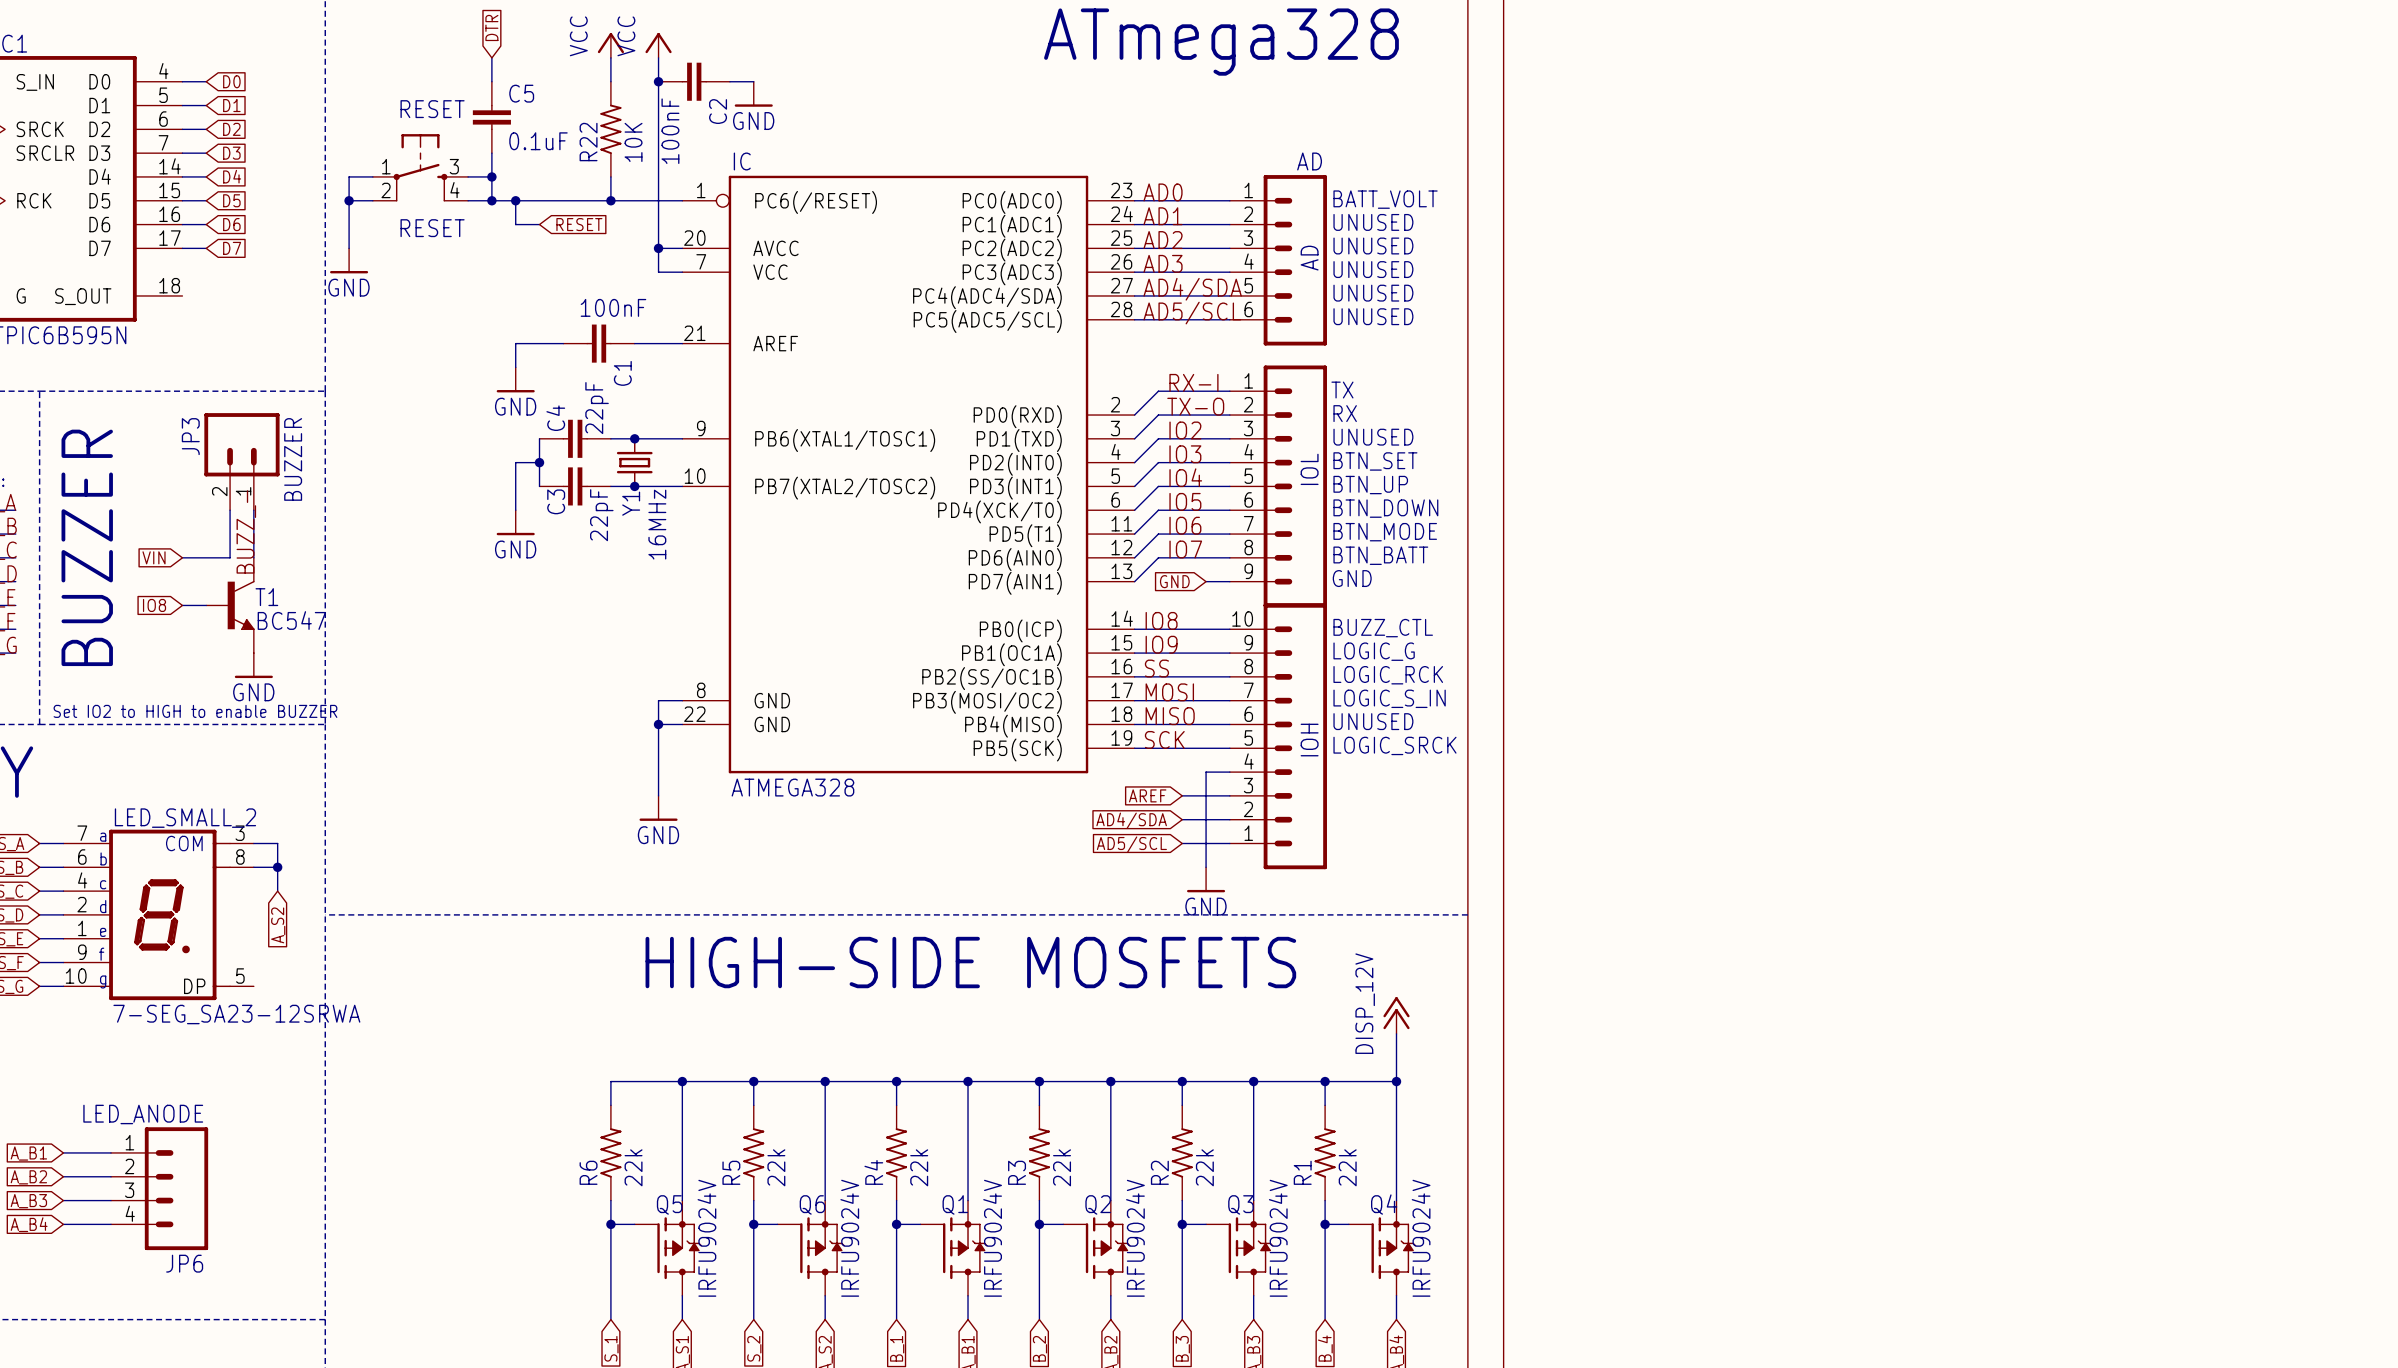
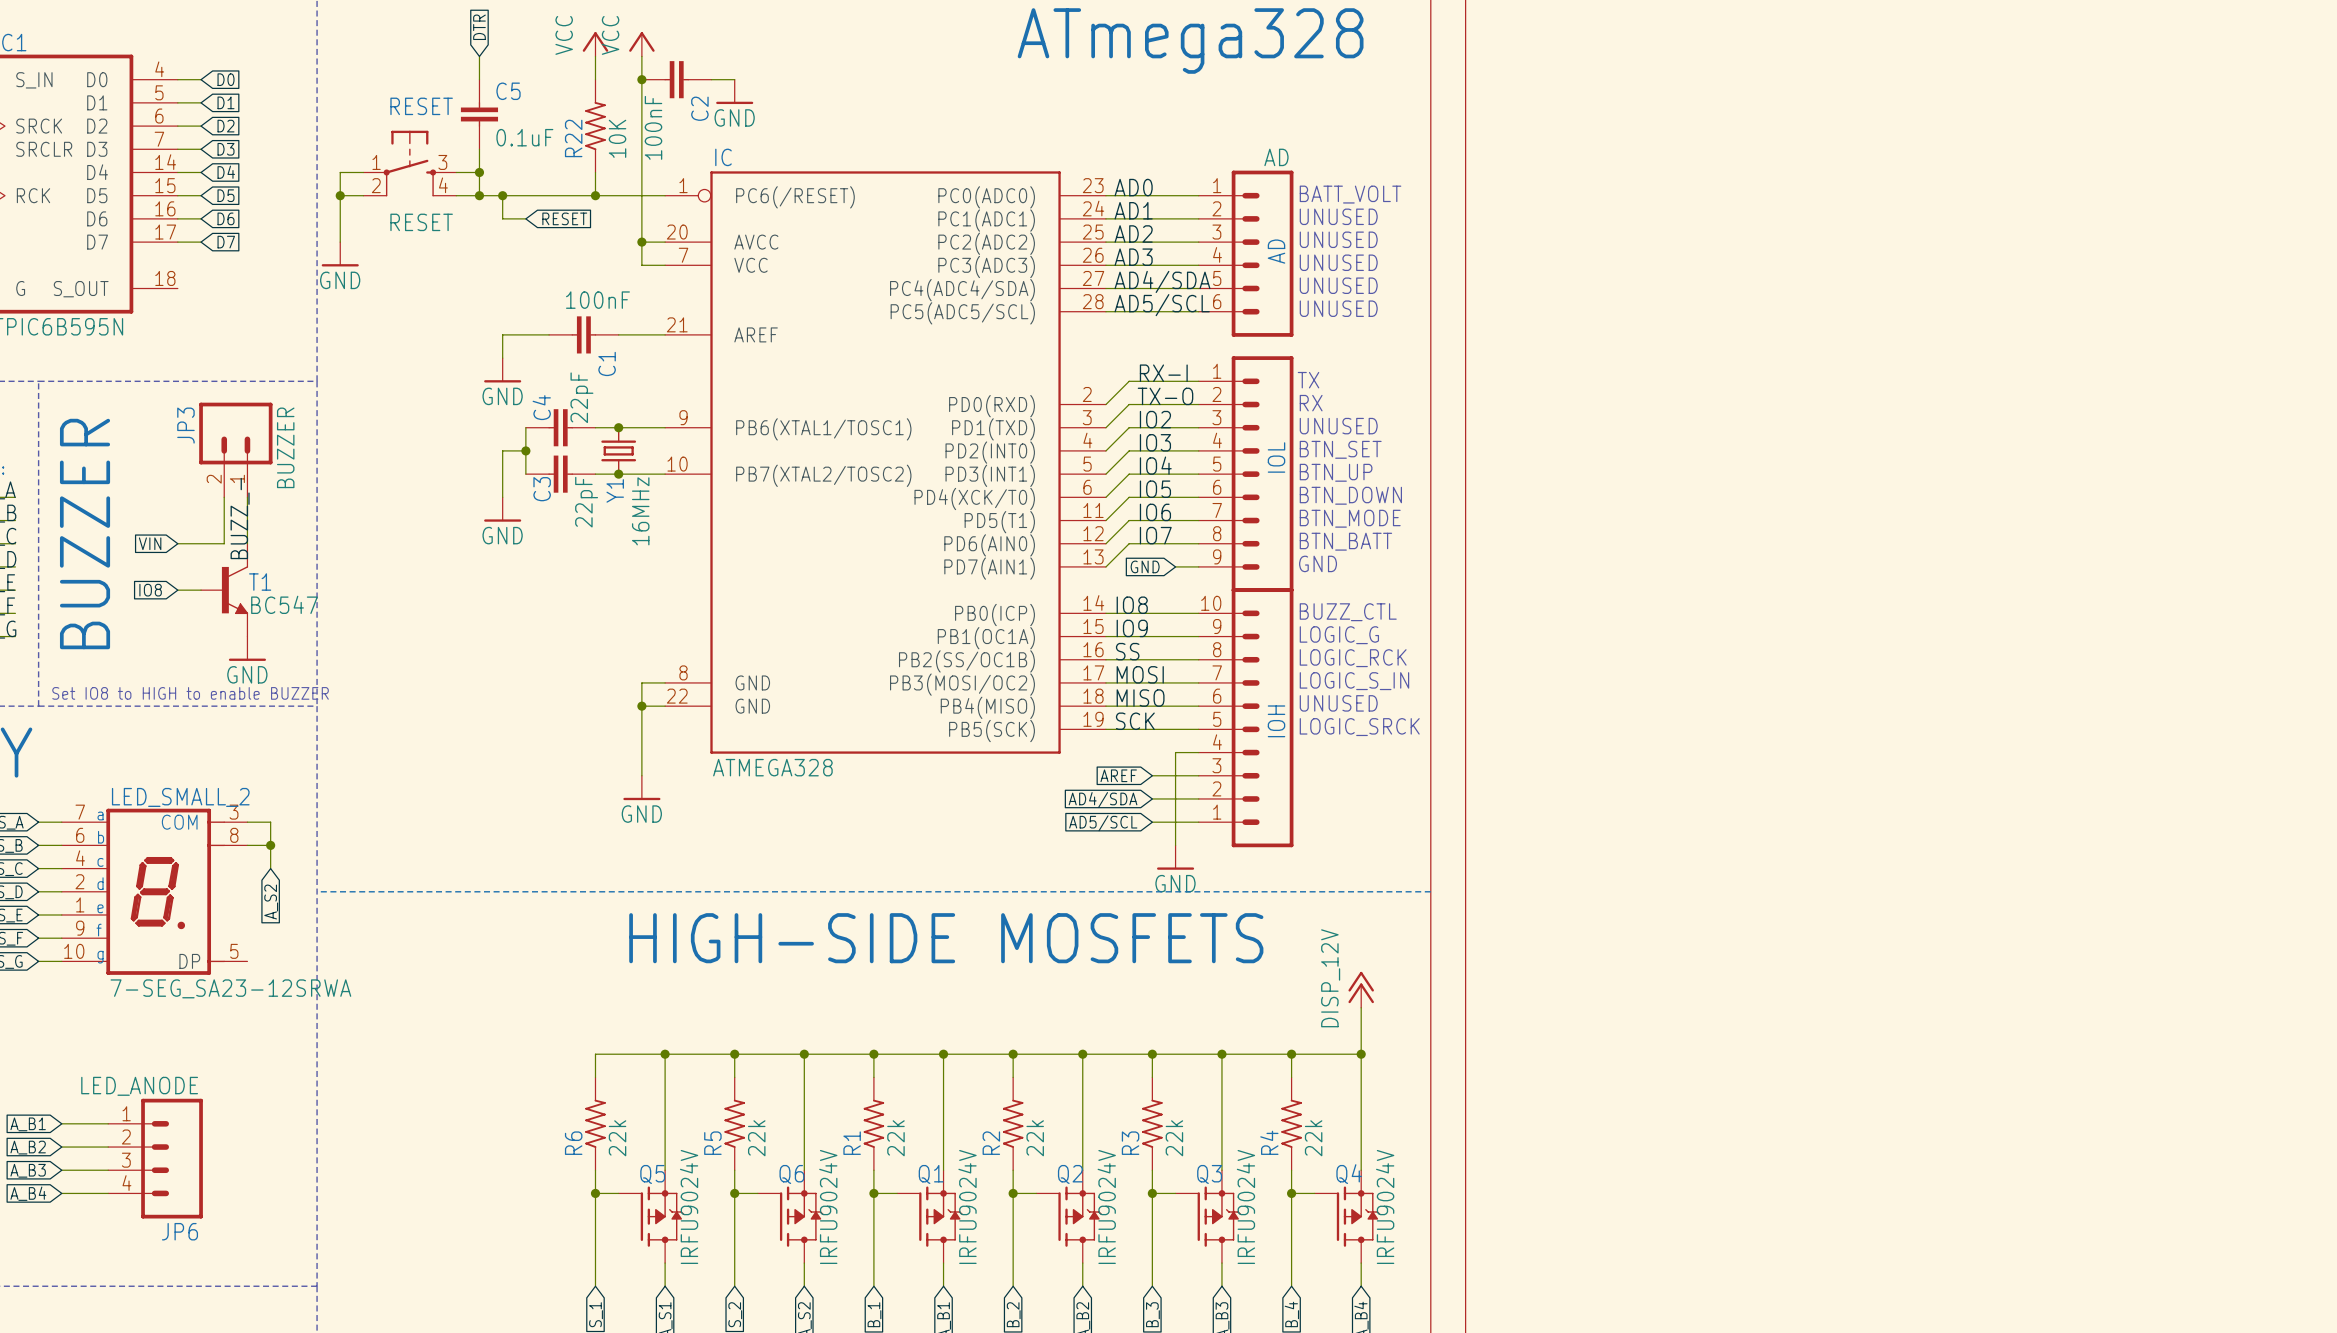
text: Set IO2 to HIGH to enable BUZZER (195, 711) -> Set IO8 to HIGH to enable BUZZER (190, 693)
R4 name: R4 (873, 1172) -> R1 (852, 1143)
R3 name: R3 (1017, 1172) -> R2 (991, 1143)
R2 name: R2 (1159, 1172) -> R3 (1130, 1143)
R1 name: R1 (1302, 1172) -> R4 (1269, 1142)

